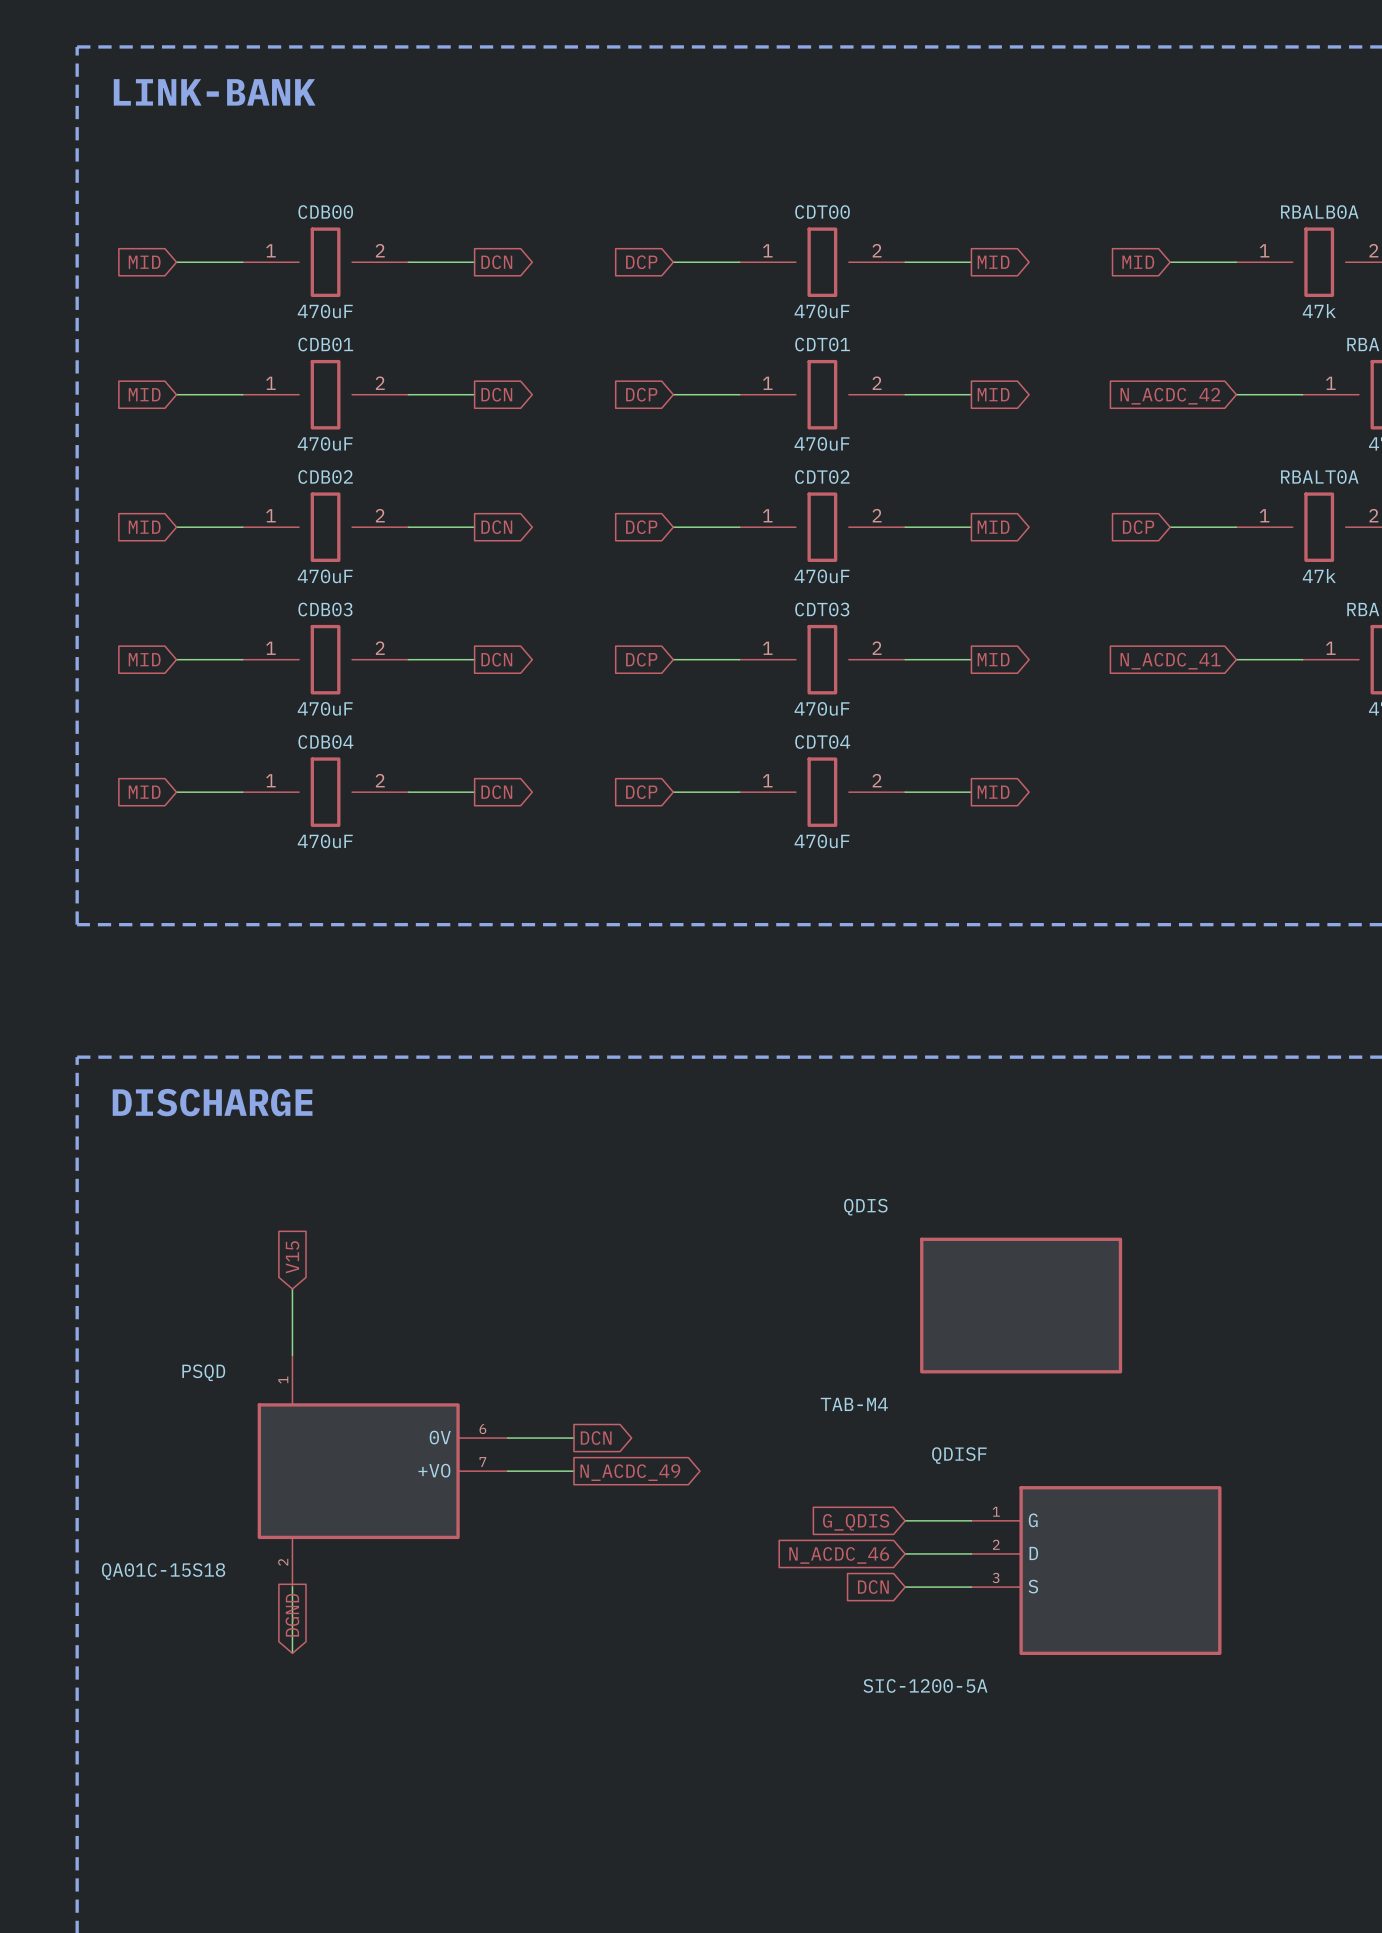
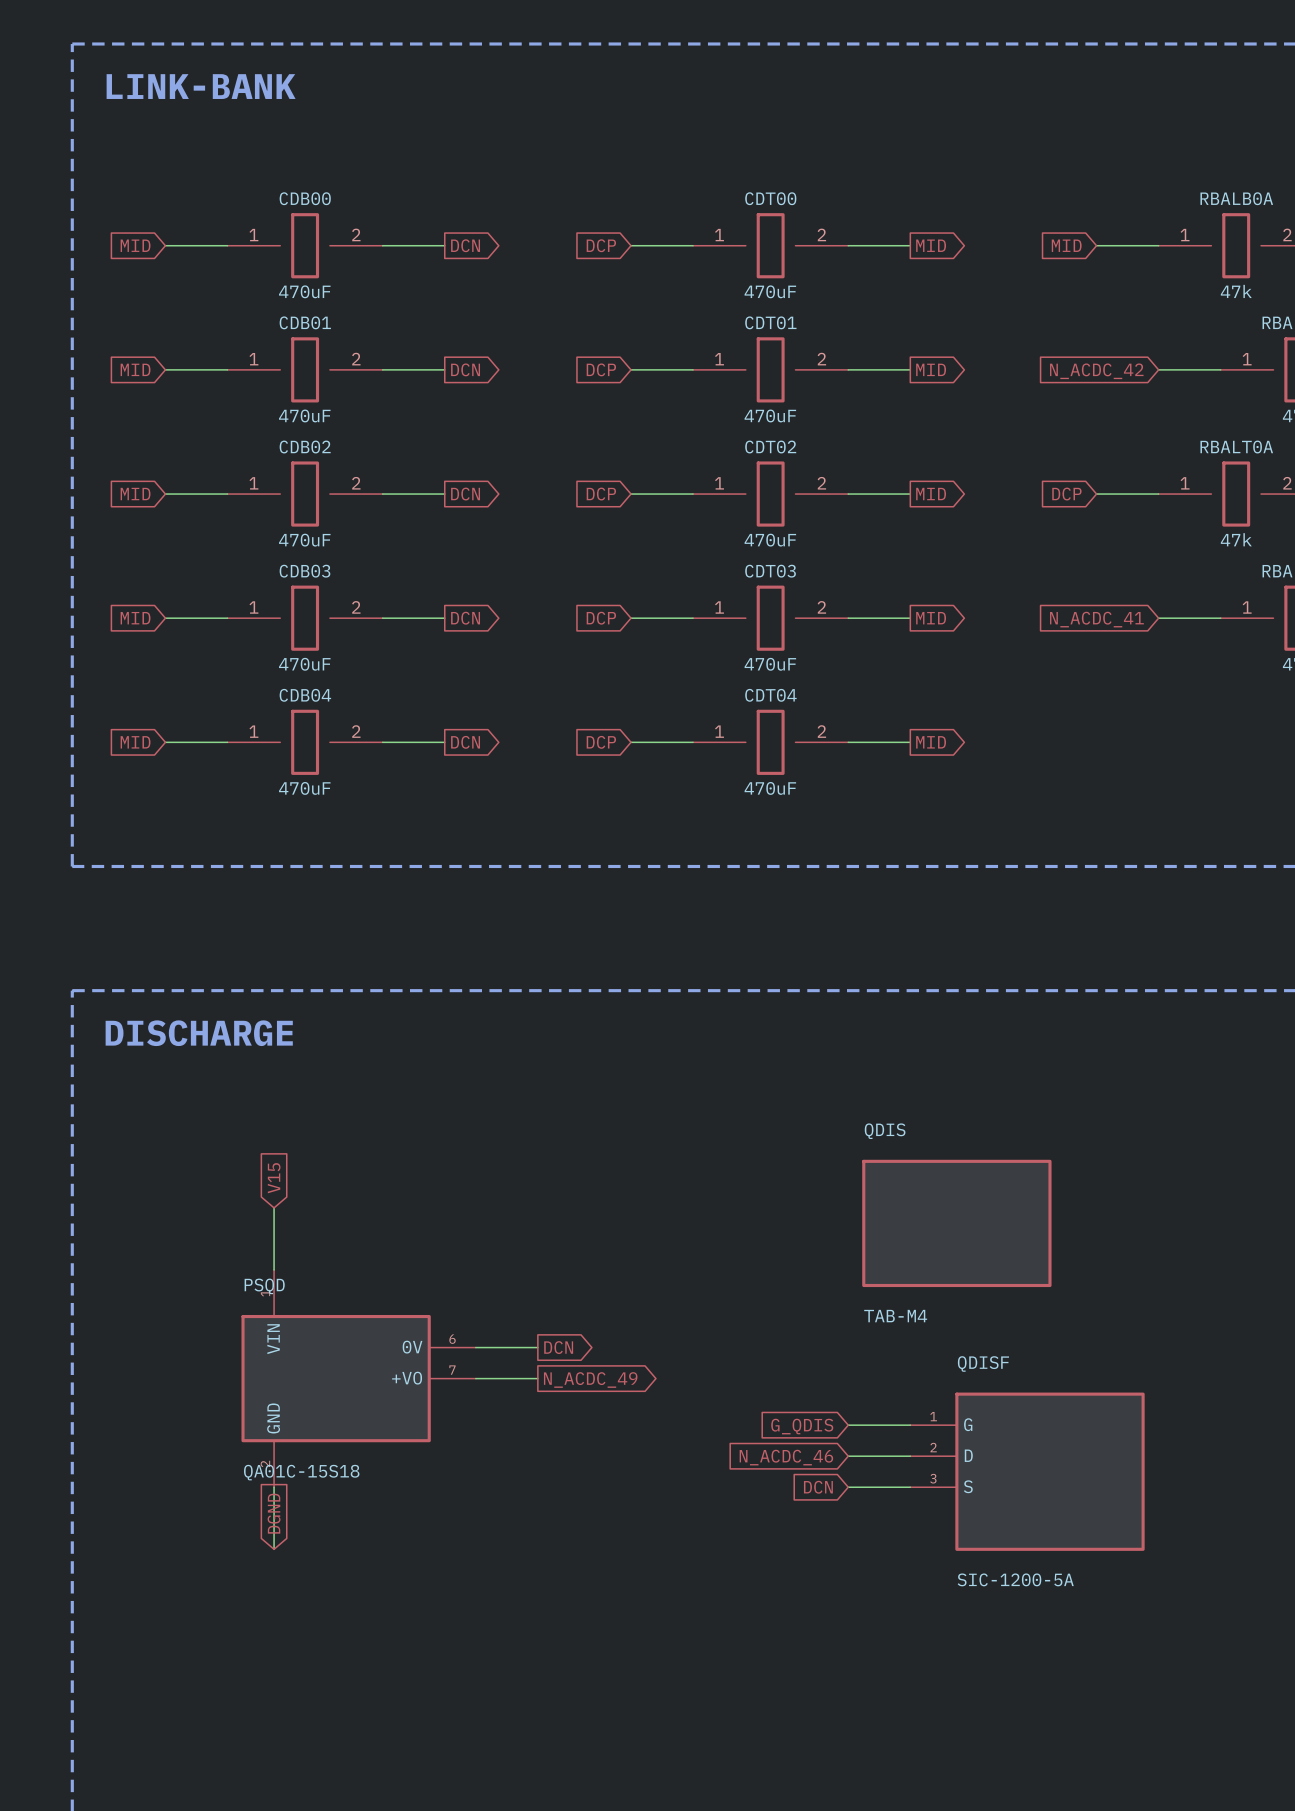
QDIS name position: QDIS (865, 1207) -> QDIS (885, 1131)
PSQD name position: PSQD (203, 1372) -> PSQD (264, 1286)
QDIS value position: TAB-M4 (854, 1404) -> TAB-M4 (895, 1316)
PSQD pin name: none -> VIN (273, 1339)
QDISF name position: QDISF (959, 1455) -> QDISF (983, 1363)
PSQD pin name: none -> GND (273, 1418)
PSQD value position: QA01C-15S18 (163, 1571) -> QA01C-15S18 (301, 1472)
QDISF value position: SIC-1200-5A (925, 1685) -> SIC-1200-5A (1015, 1579)

